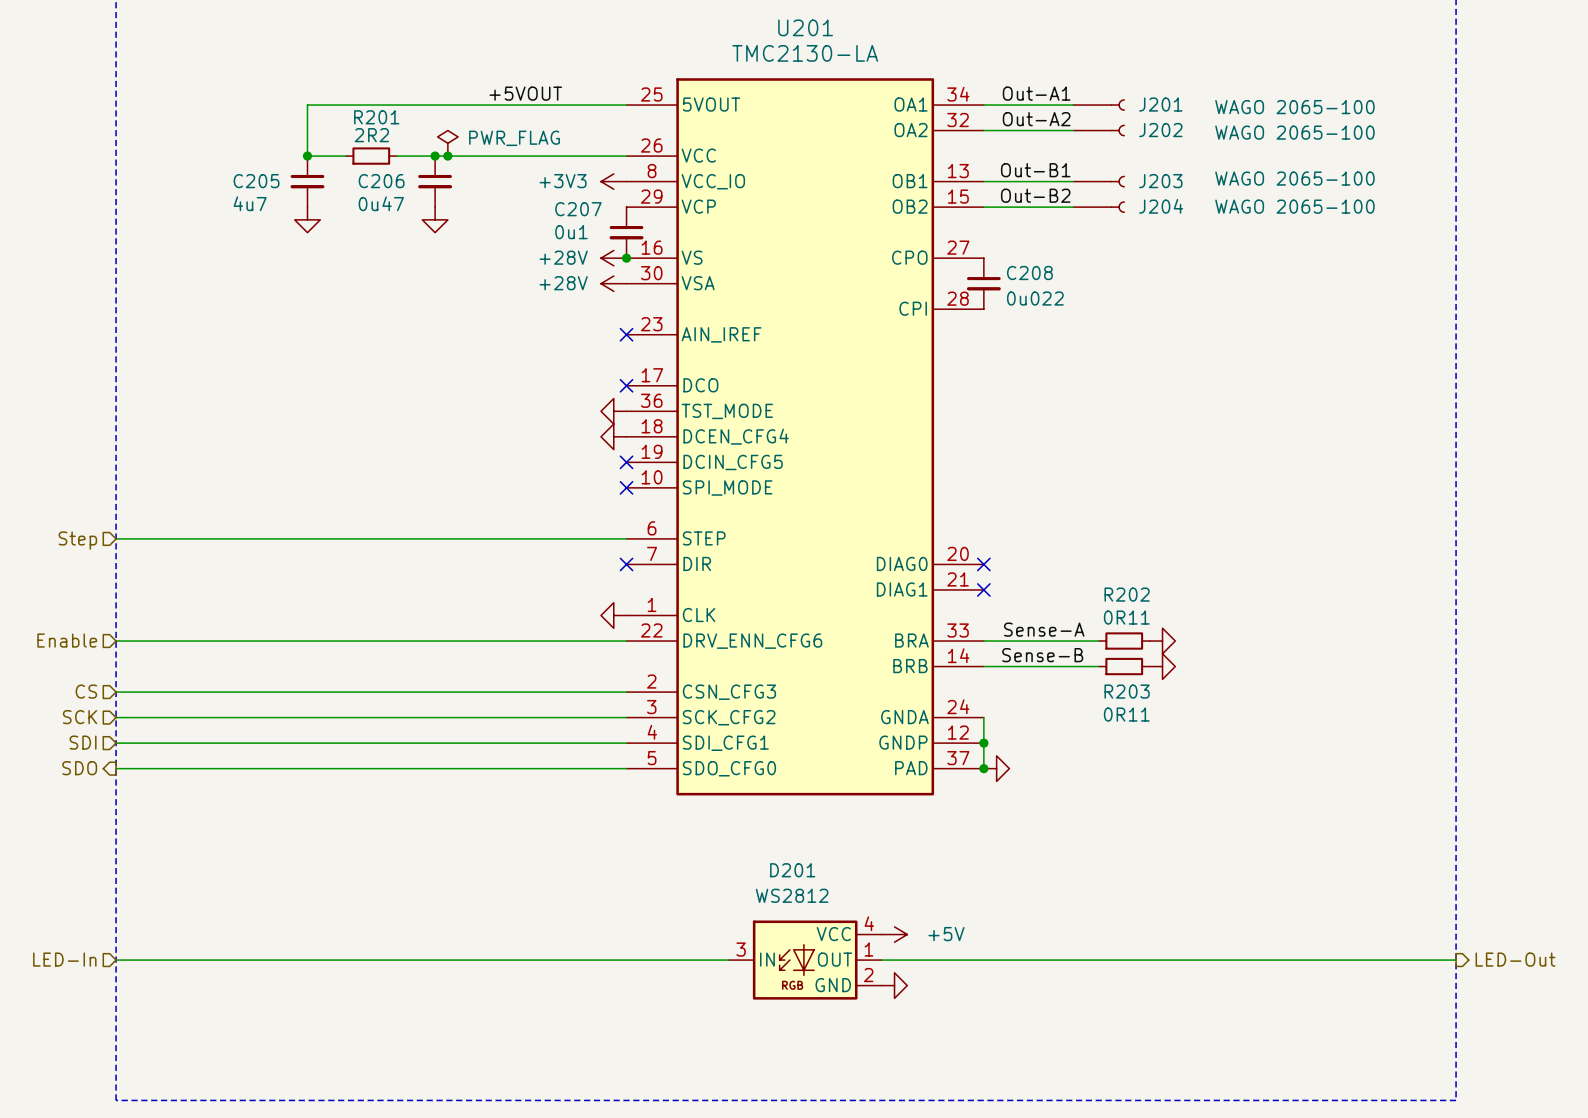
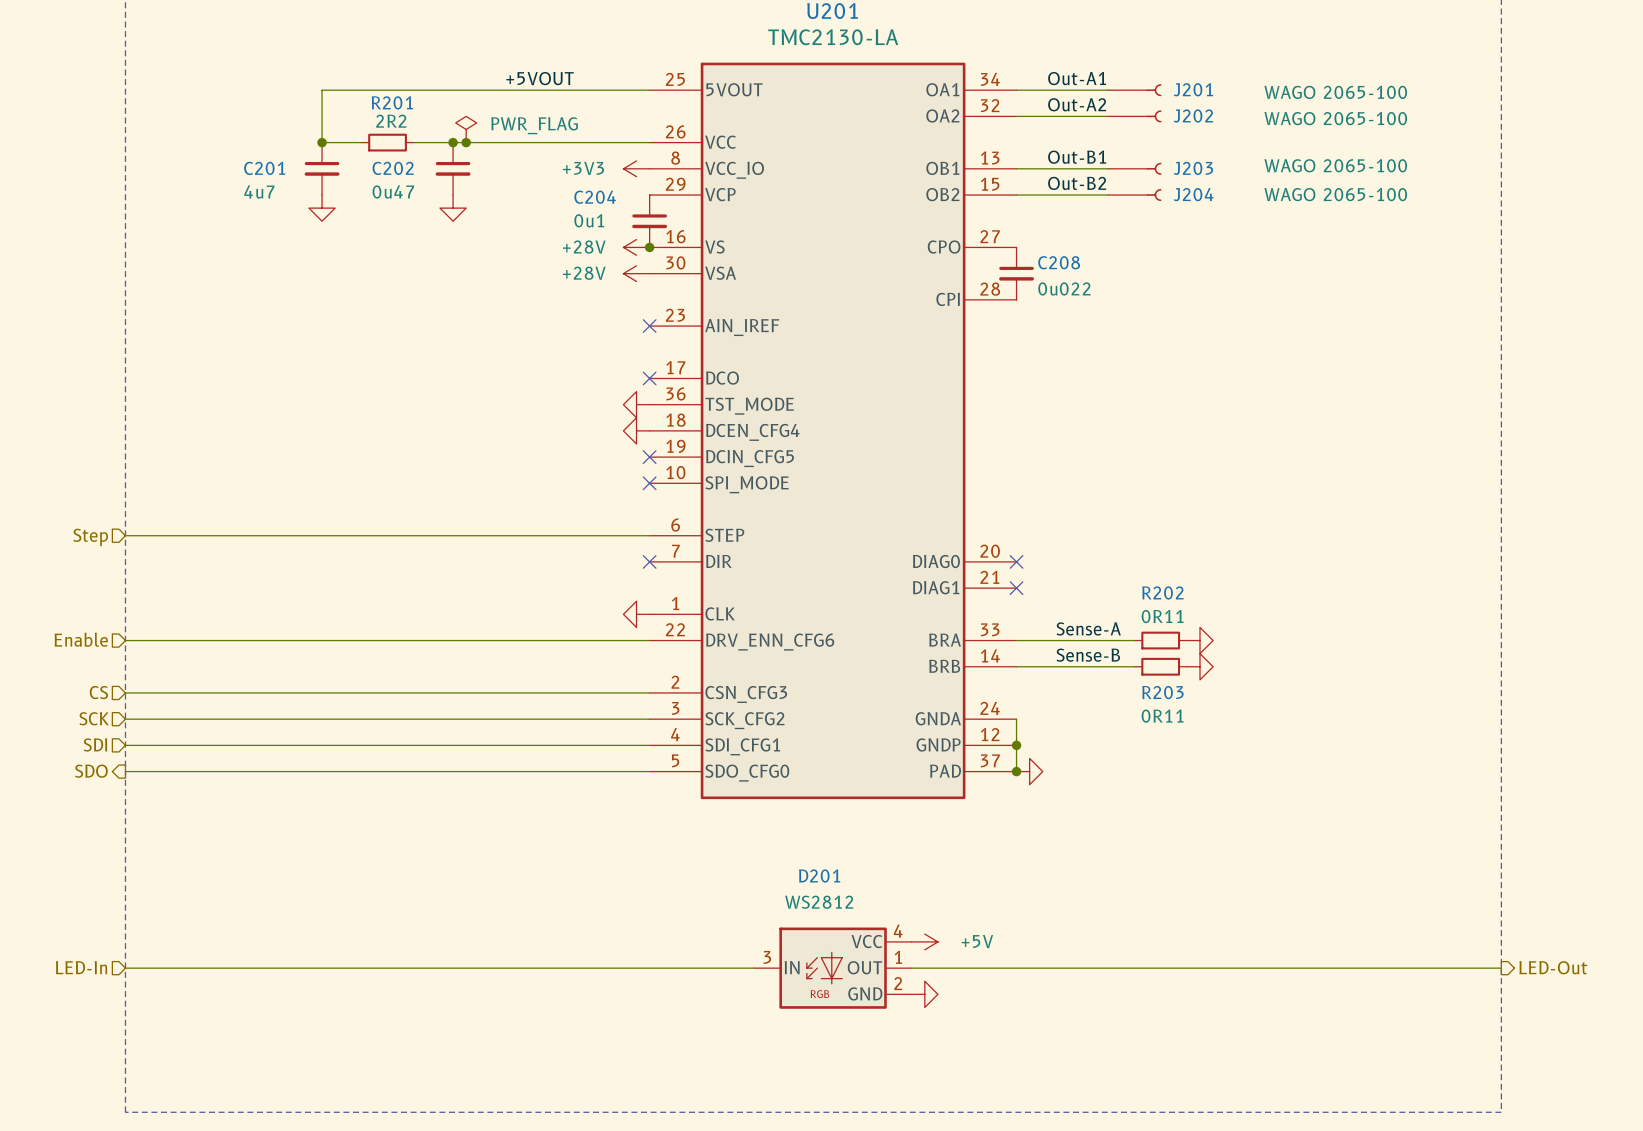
C205 name: C205 (256, 181) -> C201 (264, 168)
C206 name: C206 (381, 181) -> C202 (393, 168)
C207 name: C207 (578, 209) -> C204 (595, 197)

